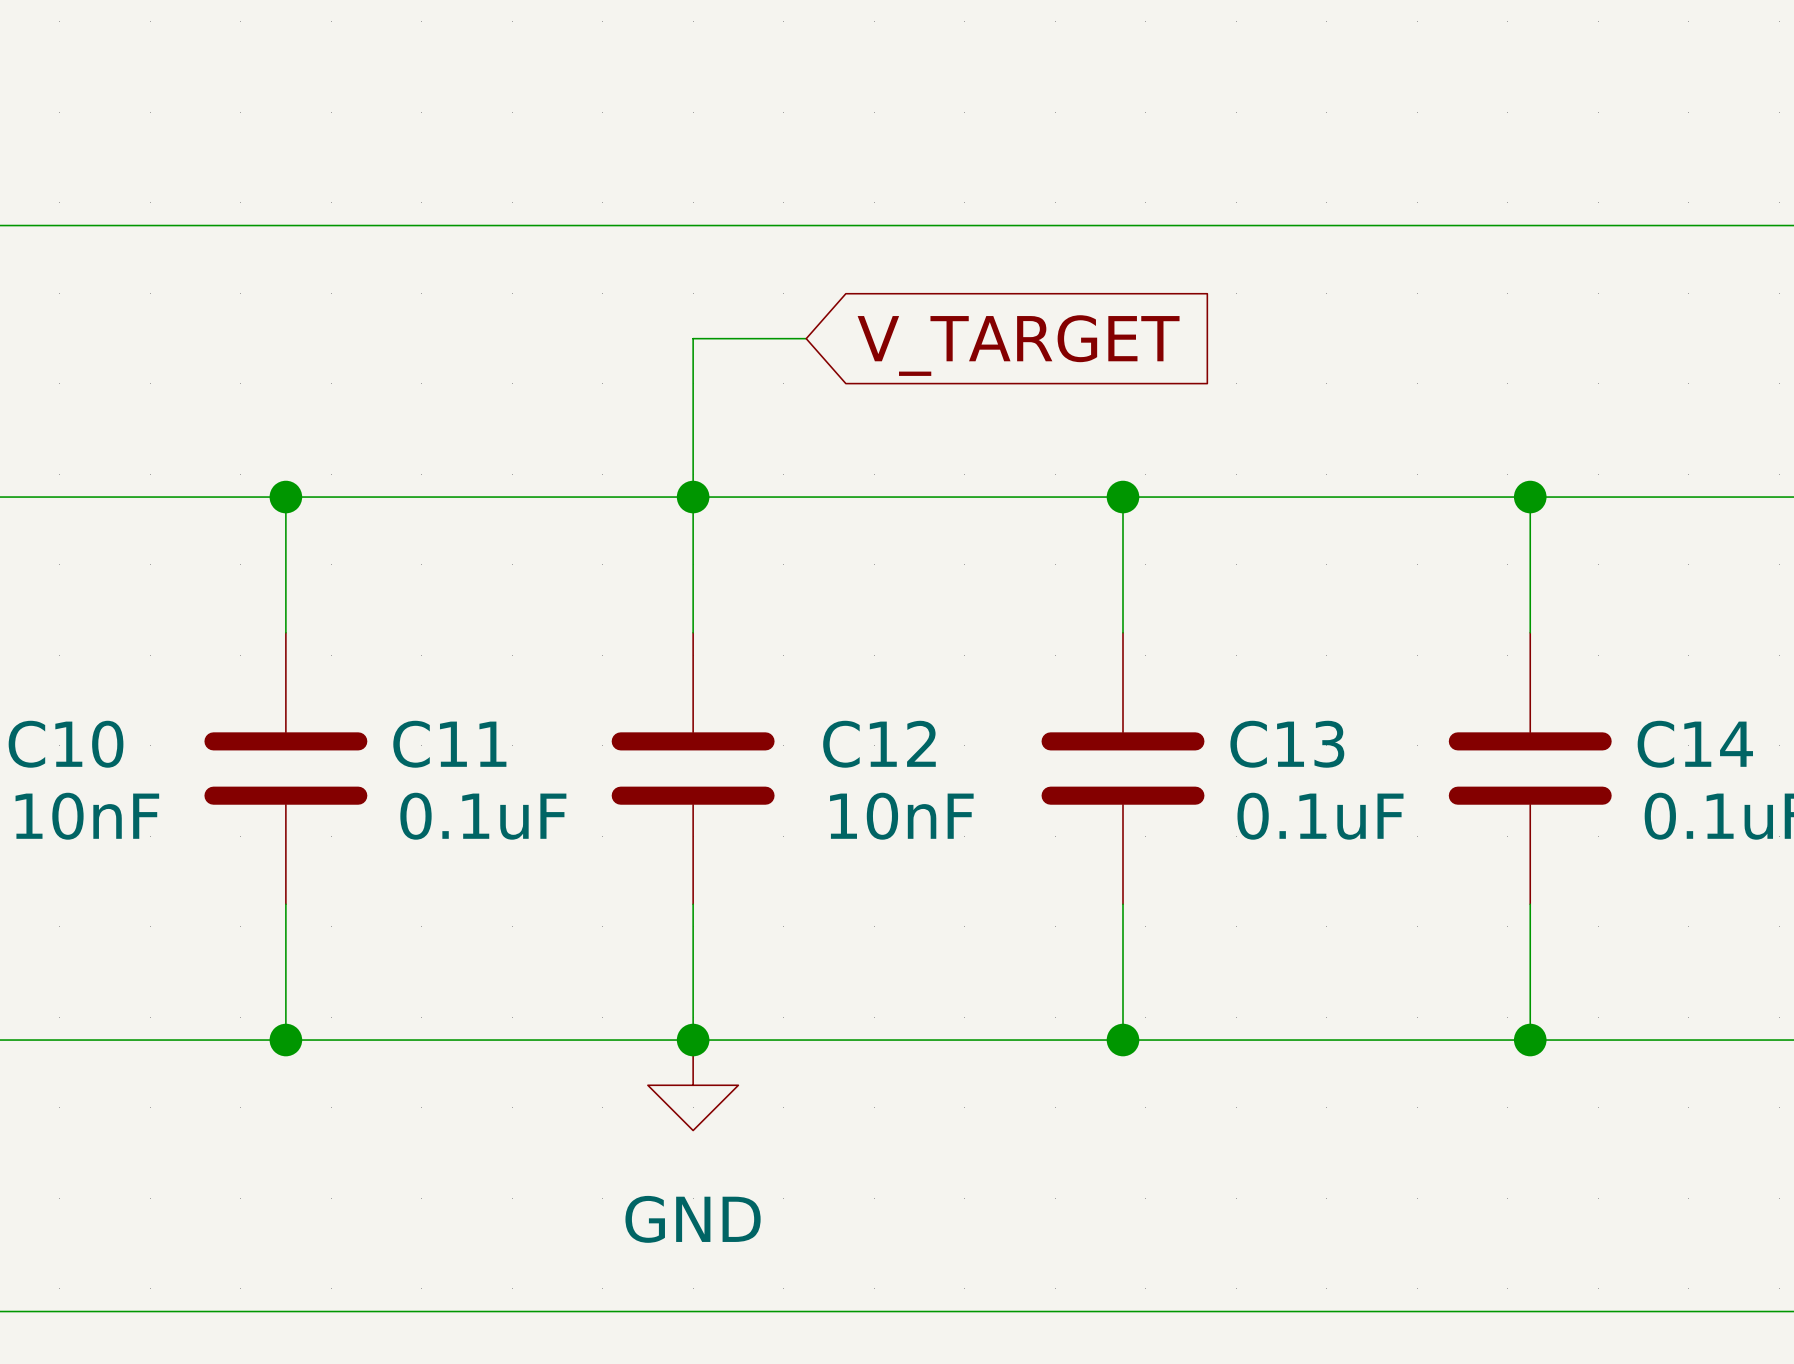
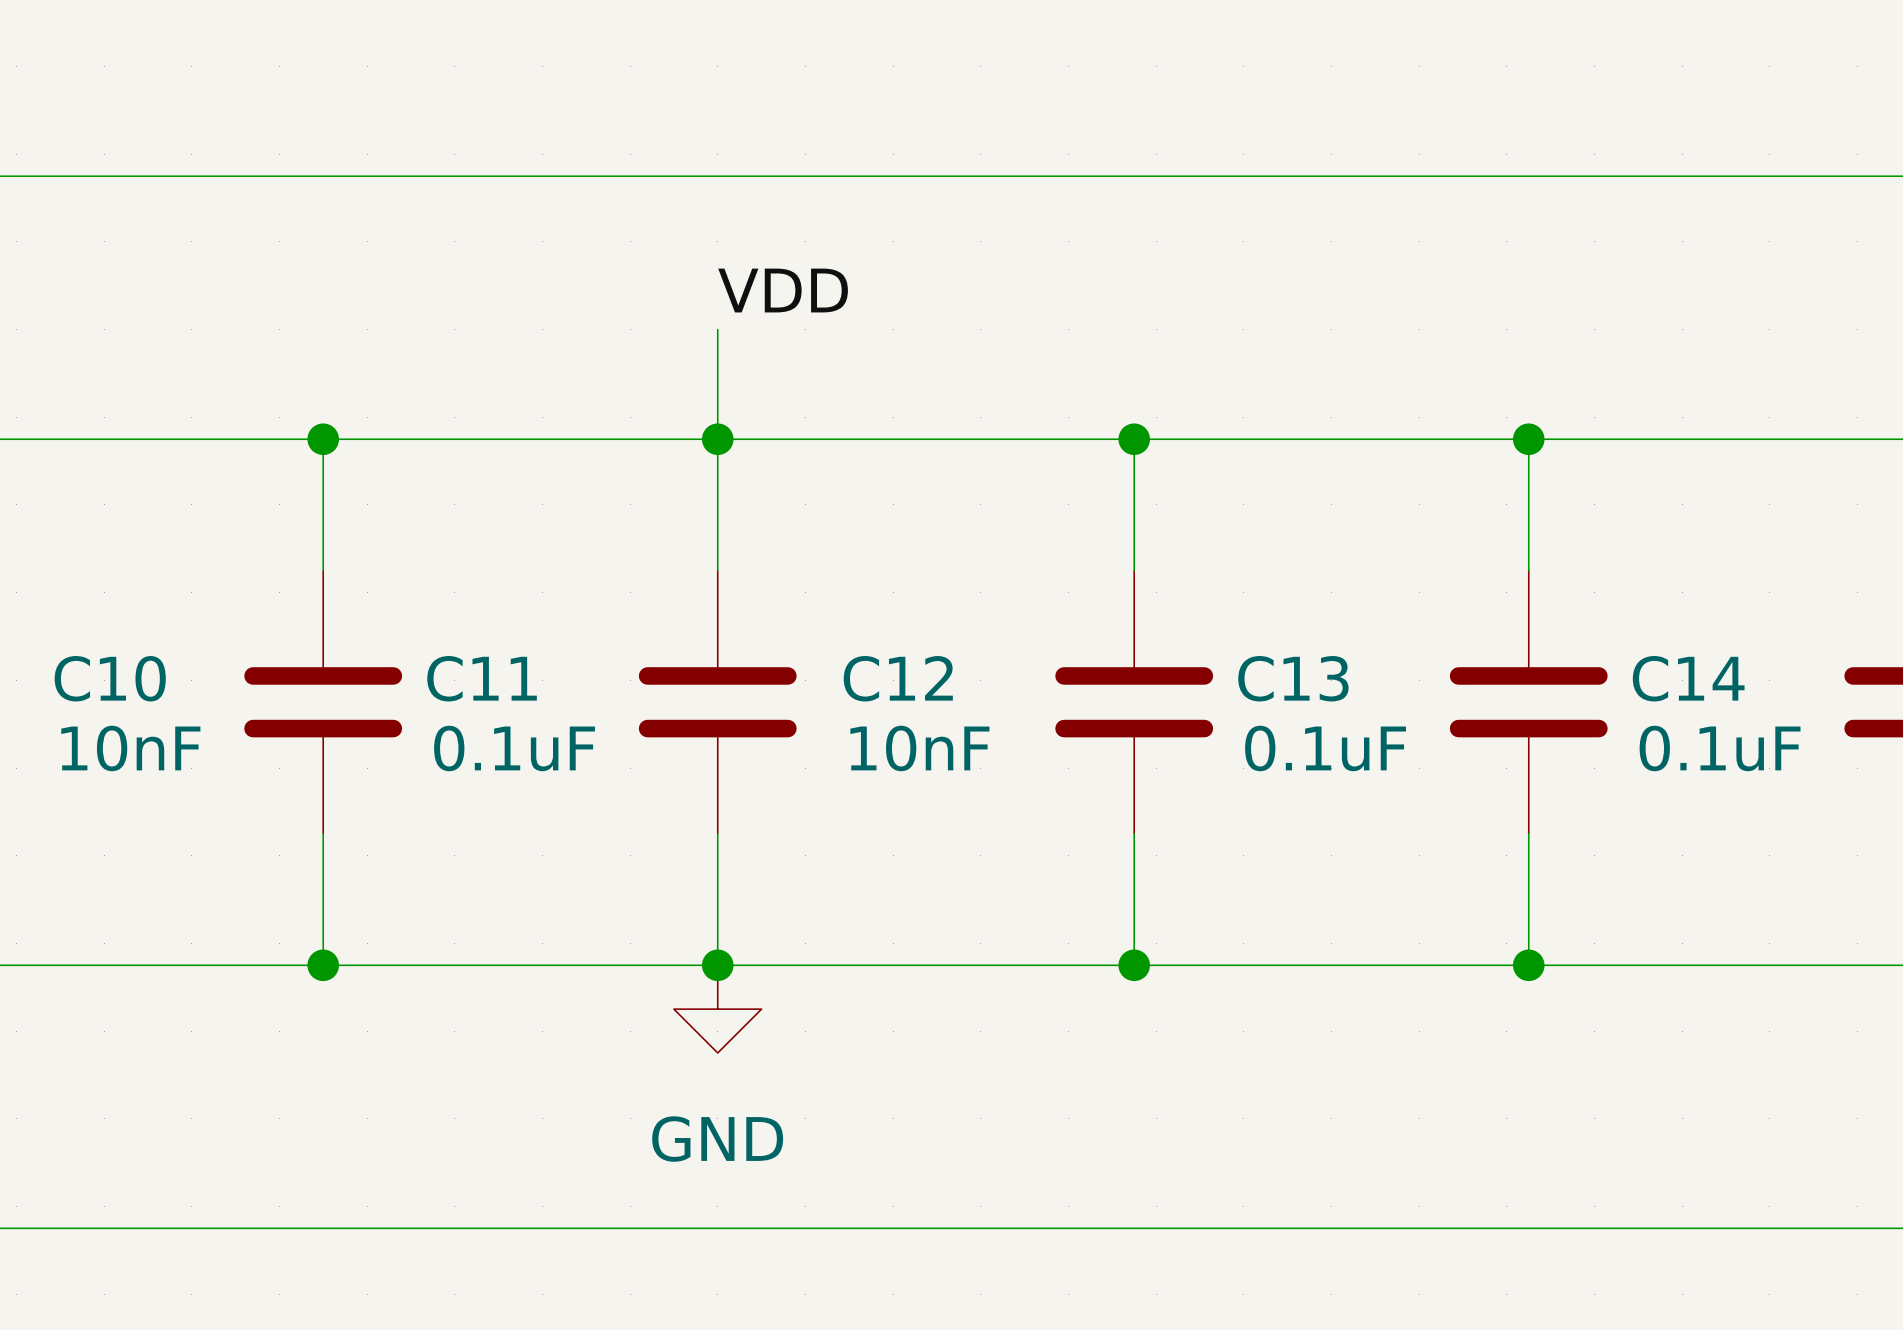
wire: (806, 338) (693, 338) (693, 383) -> none
label: none -> VDD (783, 290)
global label: V_TARGET (1018, 345) -> none

